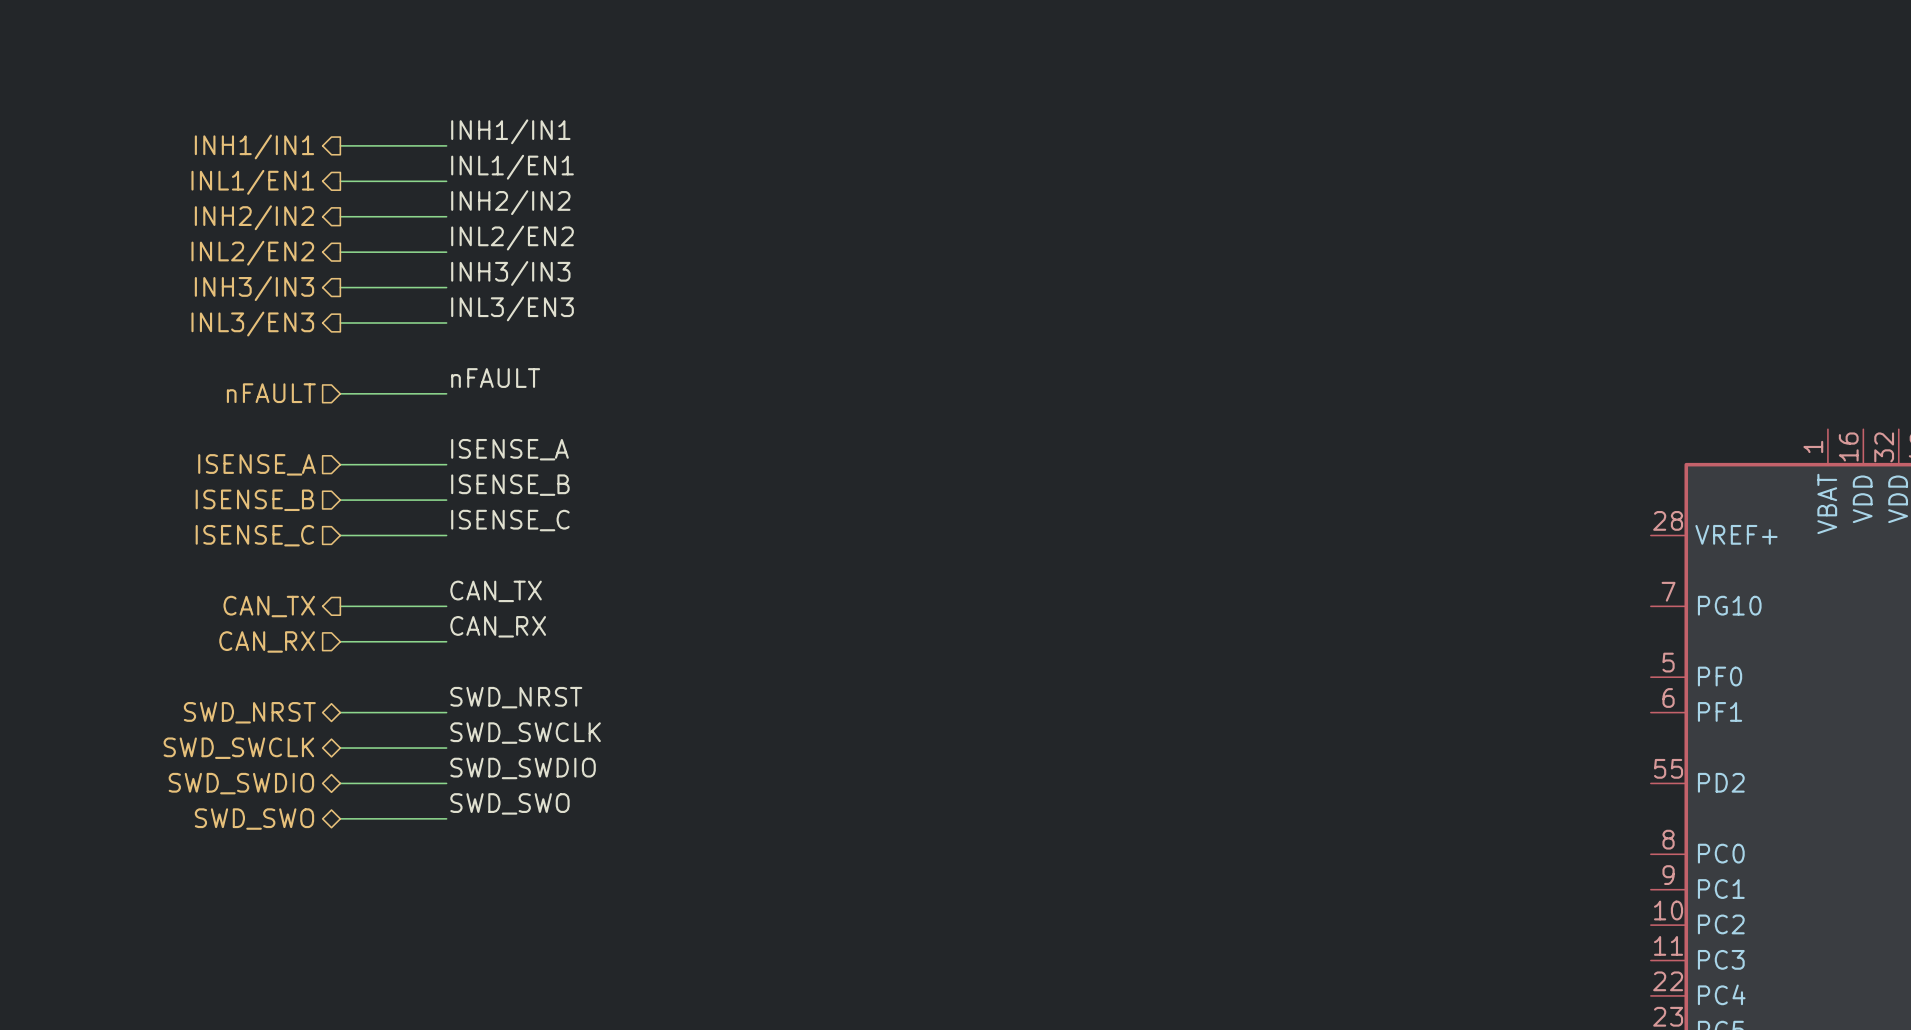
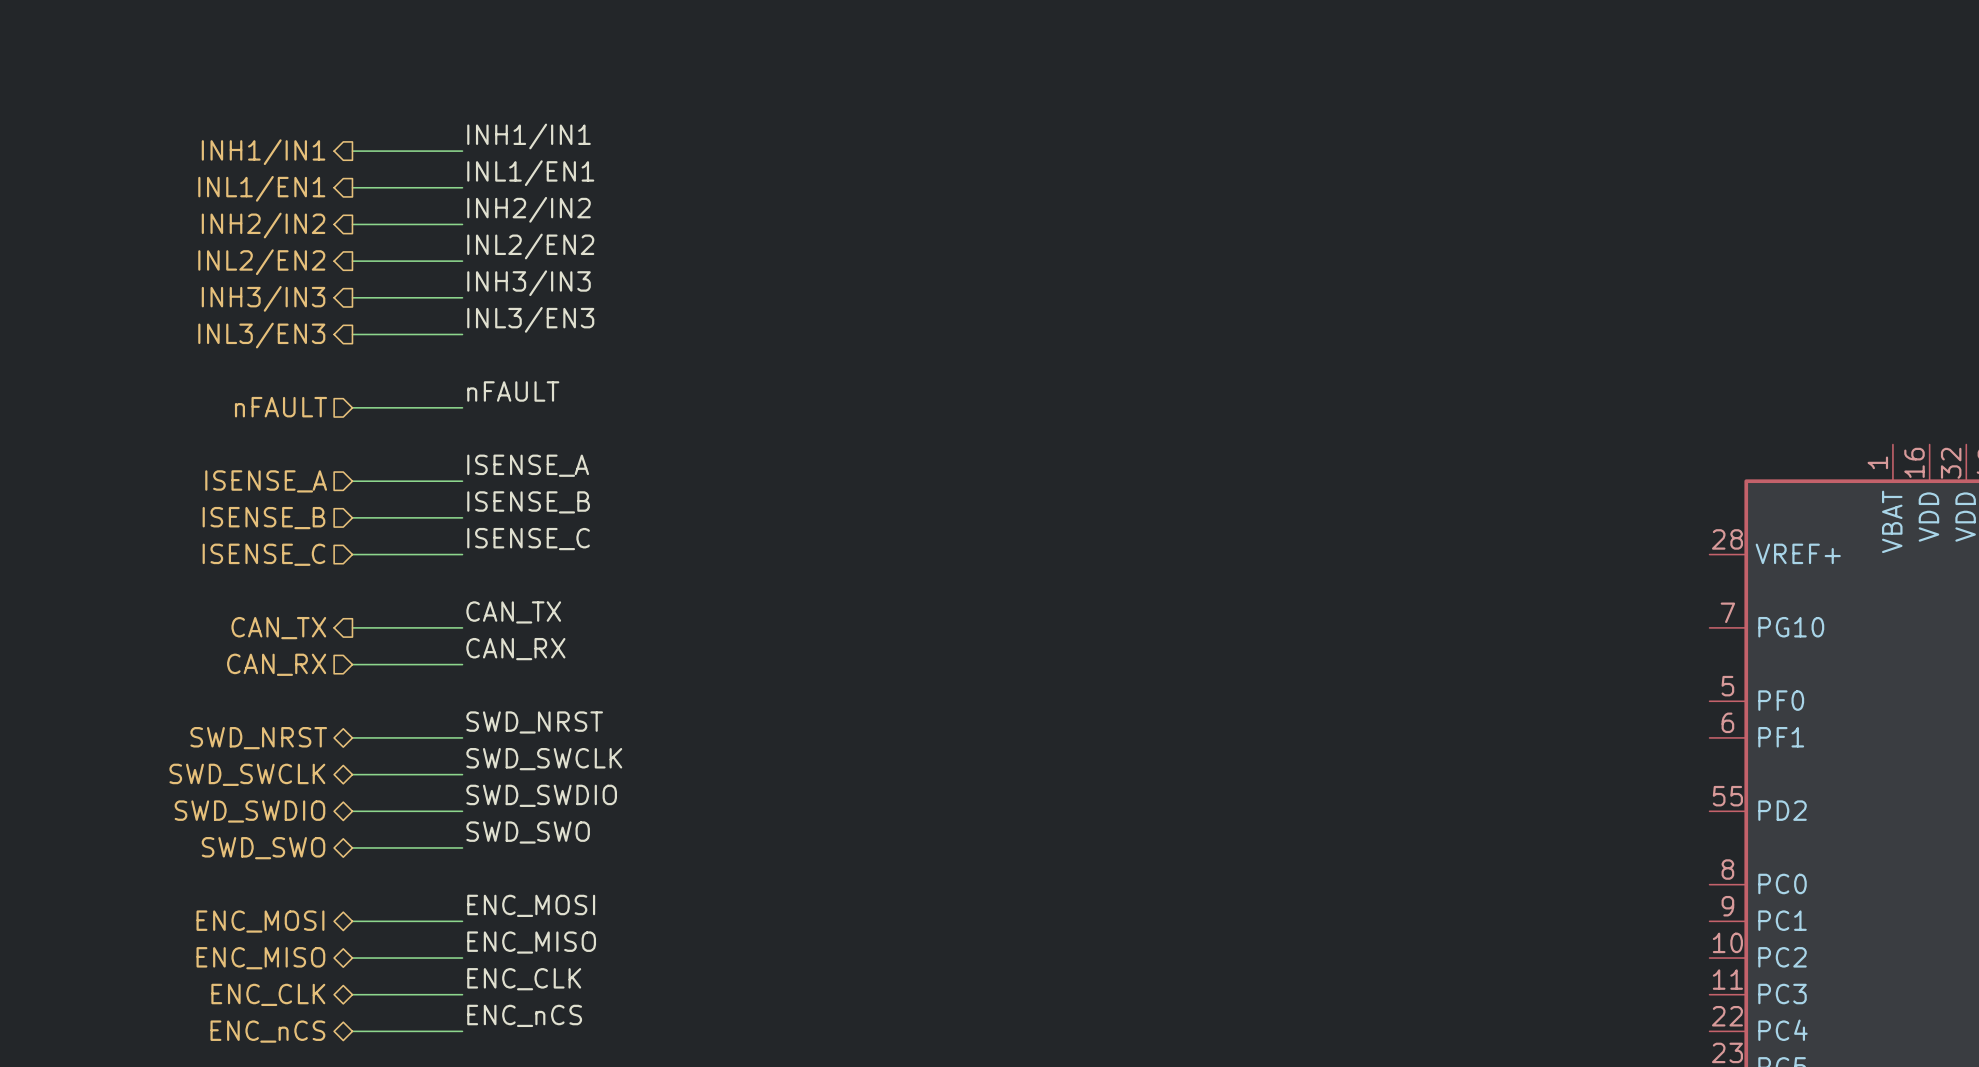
label: none -> ENC_MOSI (531, 905)
hierarchical label: none -> ENC_MOSI (260, 921)
wire: none -> (352, 921) (462, 921)
label: none -> ENC_MISO (531, 942)
hierarchical label: none -> ENC_MISO (260, 958)
wire: none -> (352, 958) (462, 958)
label: none -> ENC_CLK (524, 979)
hierarchical label: none -> ENC_CLK (268, 994)
wire: none -> (352, 994) (462, 994)
label: none -> ENC_nCS (524, 1015)
wire: none -> (352, 1031) (462, 1031)
hierarchical label: none -> ENC_nCS (267, 1031)

